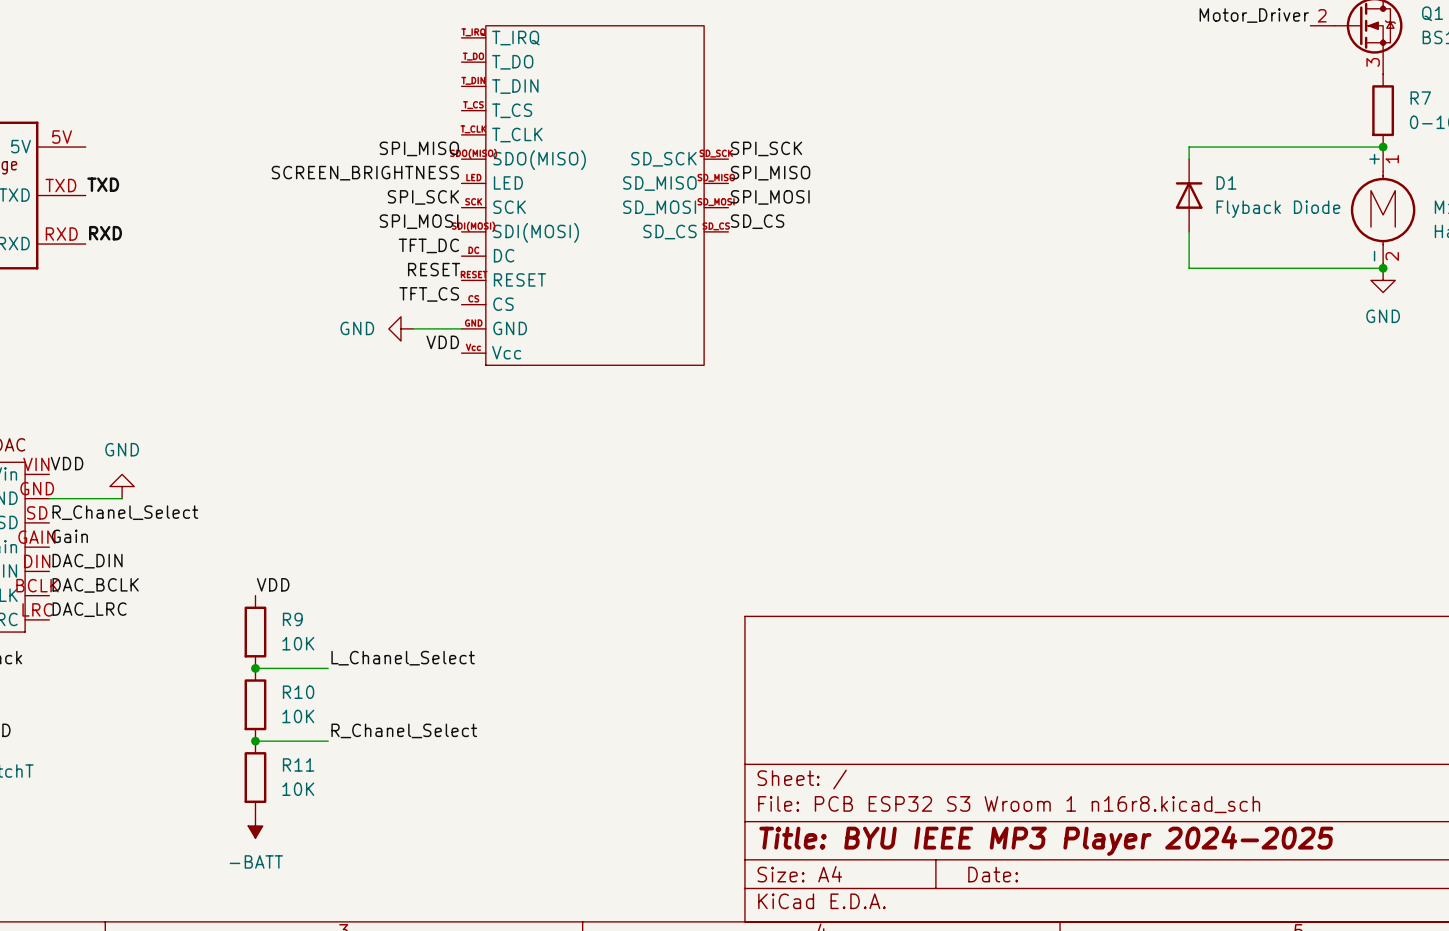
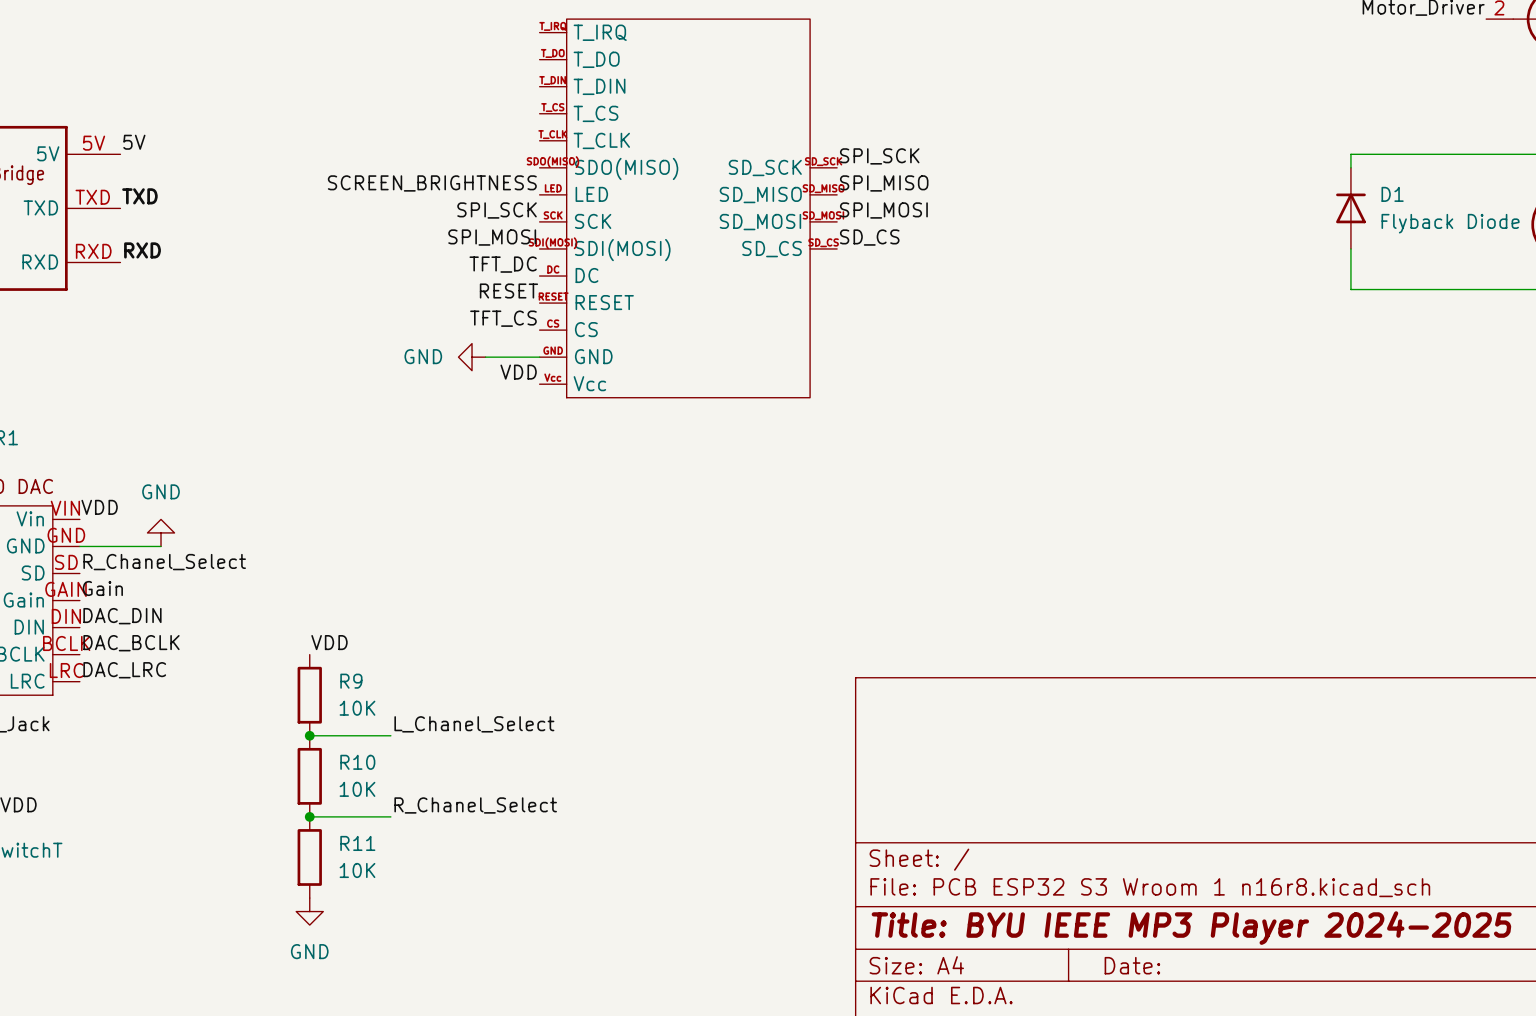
label: none -> 5V (134, 142)
label: SPI_MISO (419, 148) -> none
power symbol: -BATT (255, 826) -> GND (309, 911)

